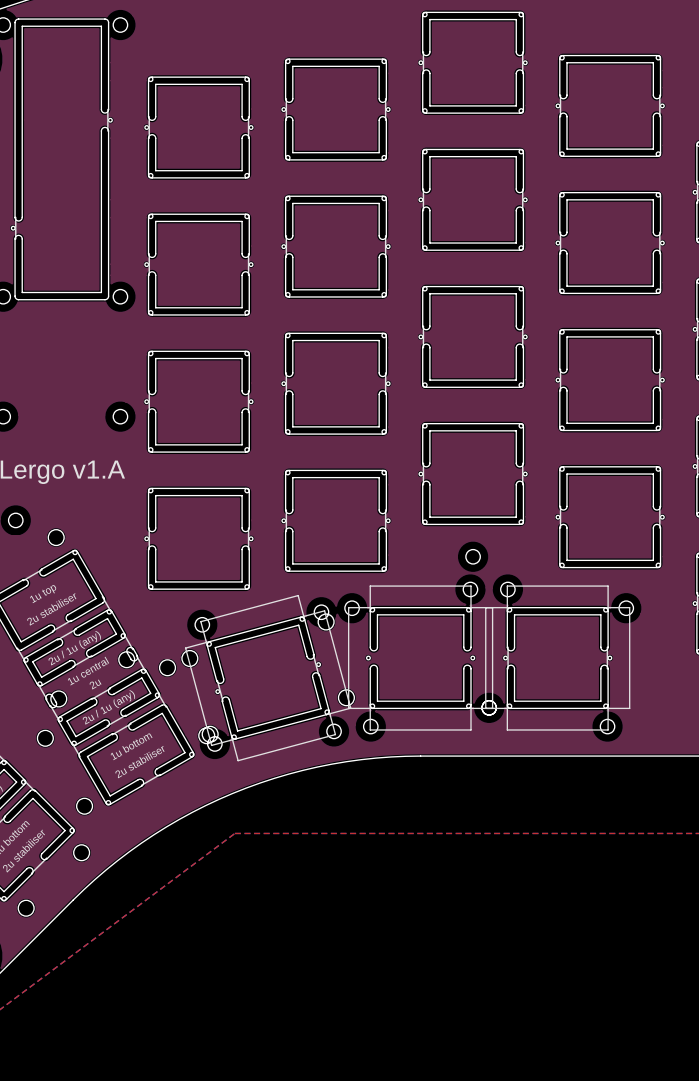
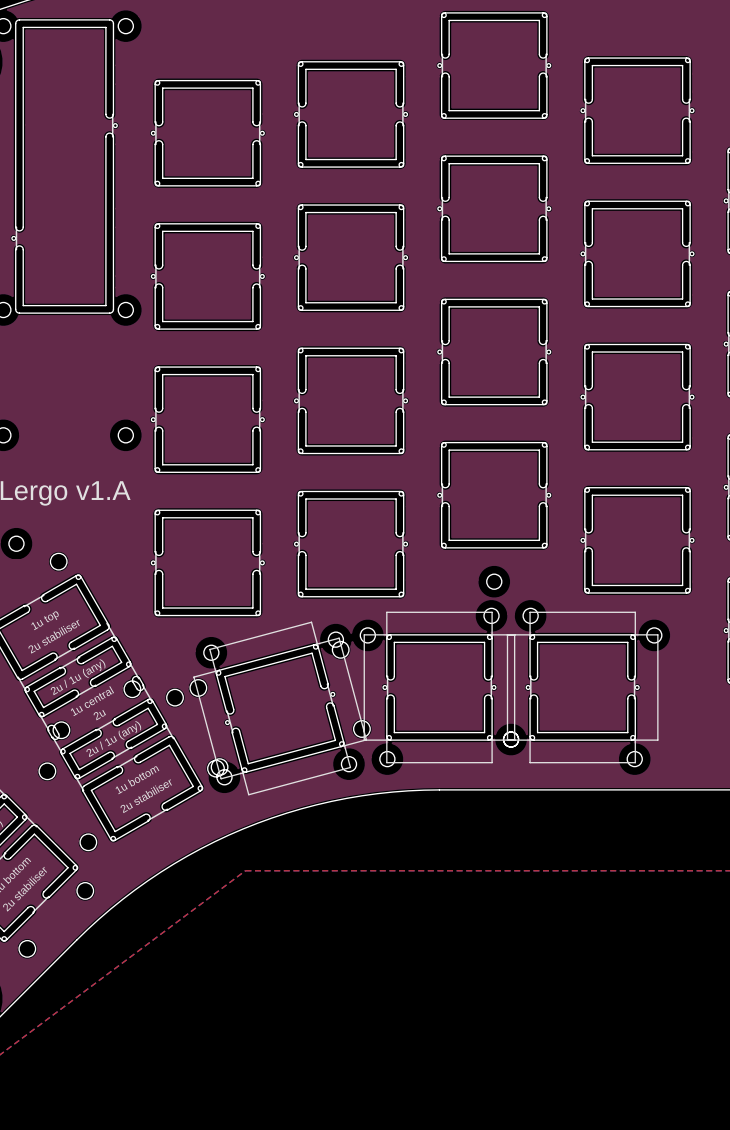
part footprint: [344, 582, 497, 734] -> [360, 608, 519, 767]

